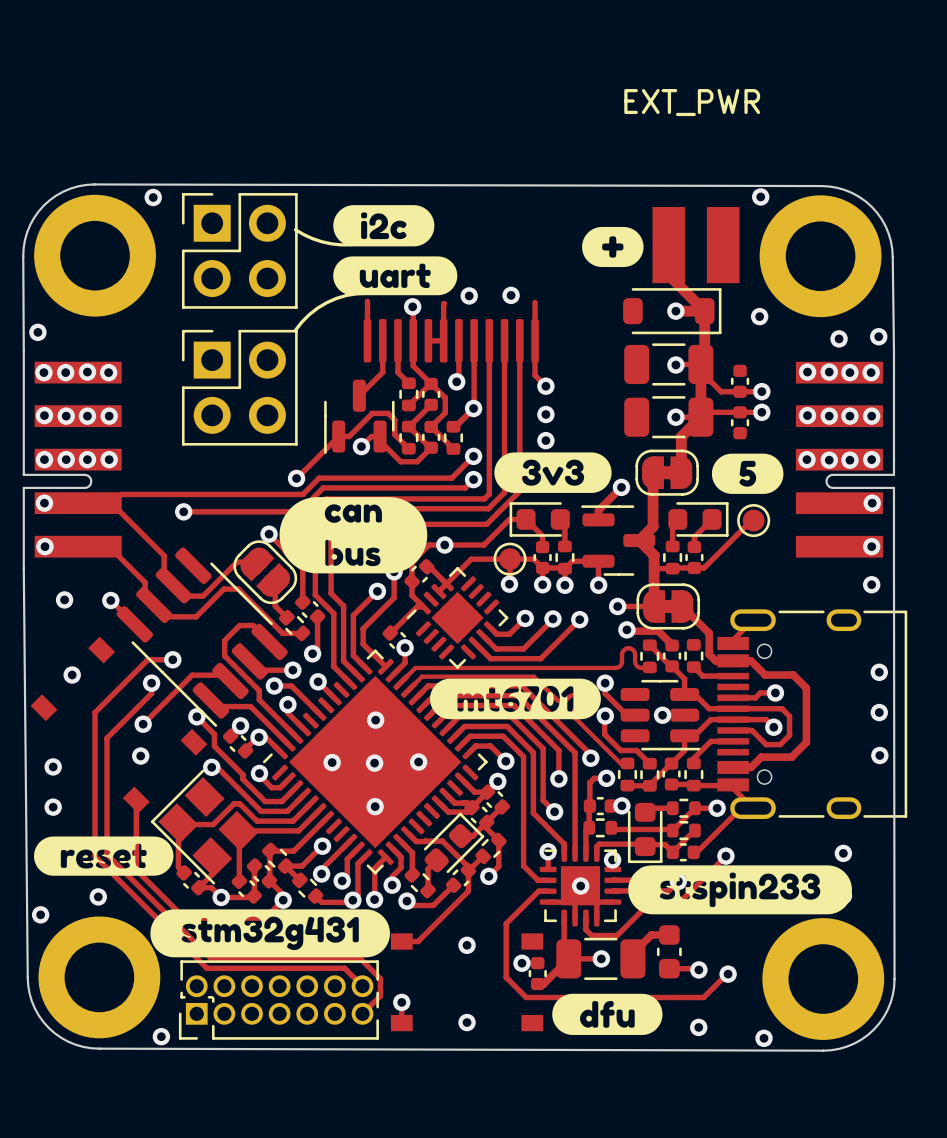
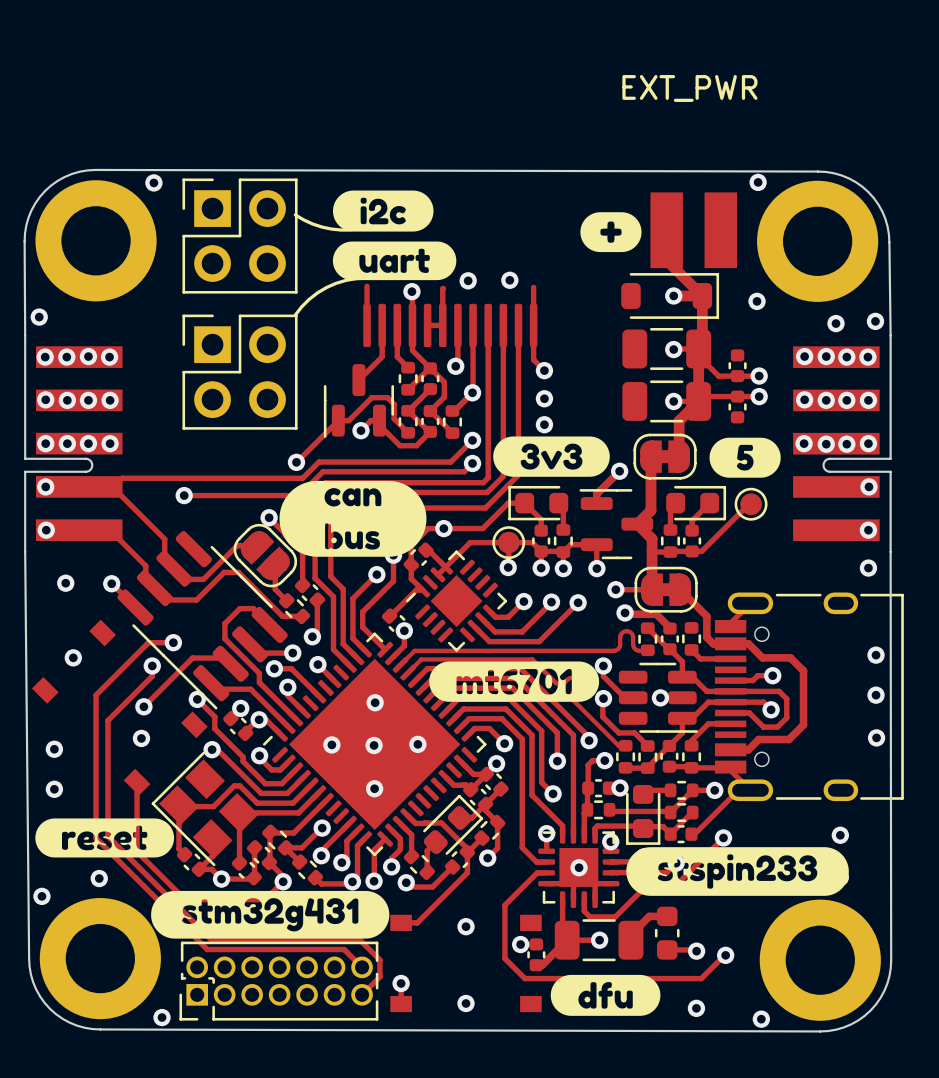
track: (439, 803) (448, 812) (467, 812) (471, 807) -> none

